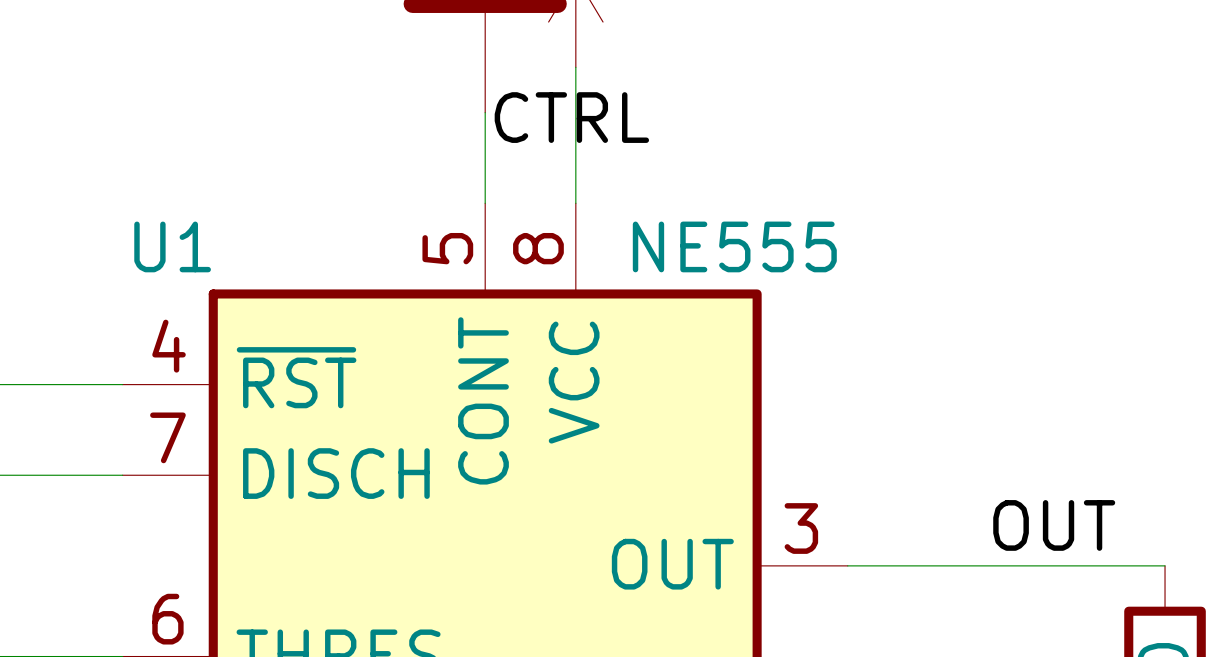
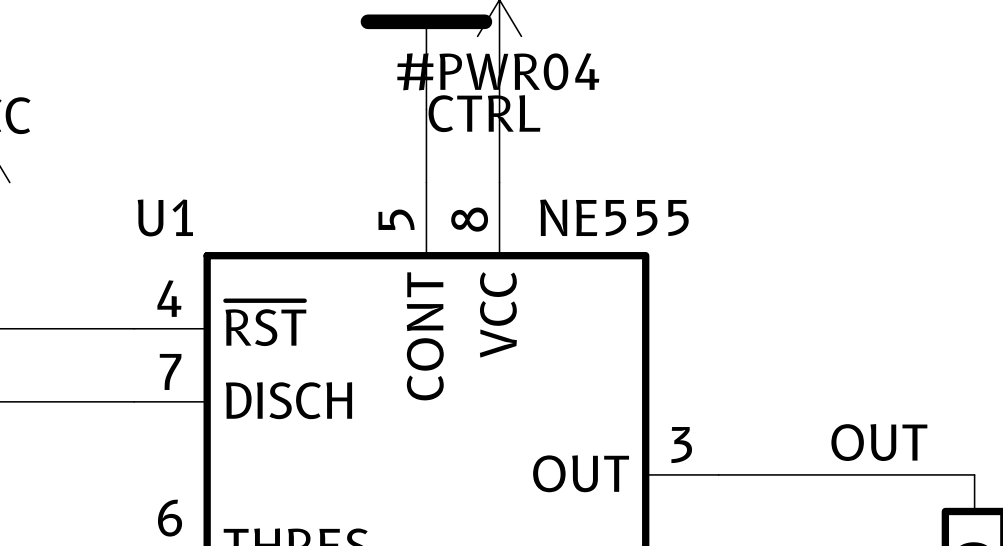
#PWR04 name: none -> #PWR04 (498, 71)

